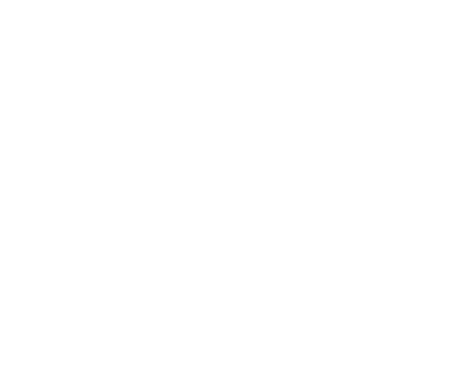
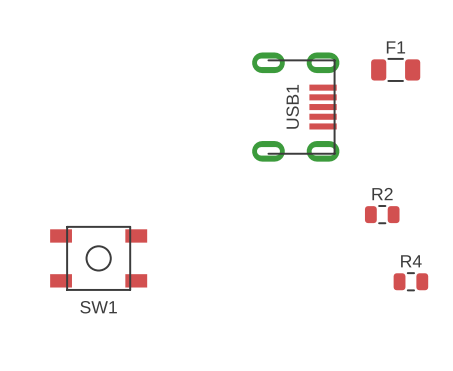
F1: none -> (395, 69)
USB1: none -> (295, 107)
R2: none -> (382, 214)
SW1: none -> (98, 258)
R4: none -> (410, 281)

